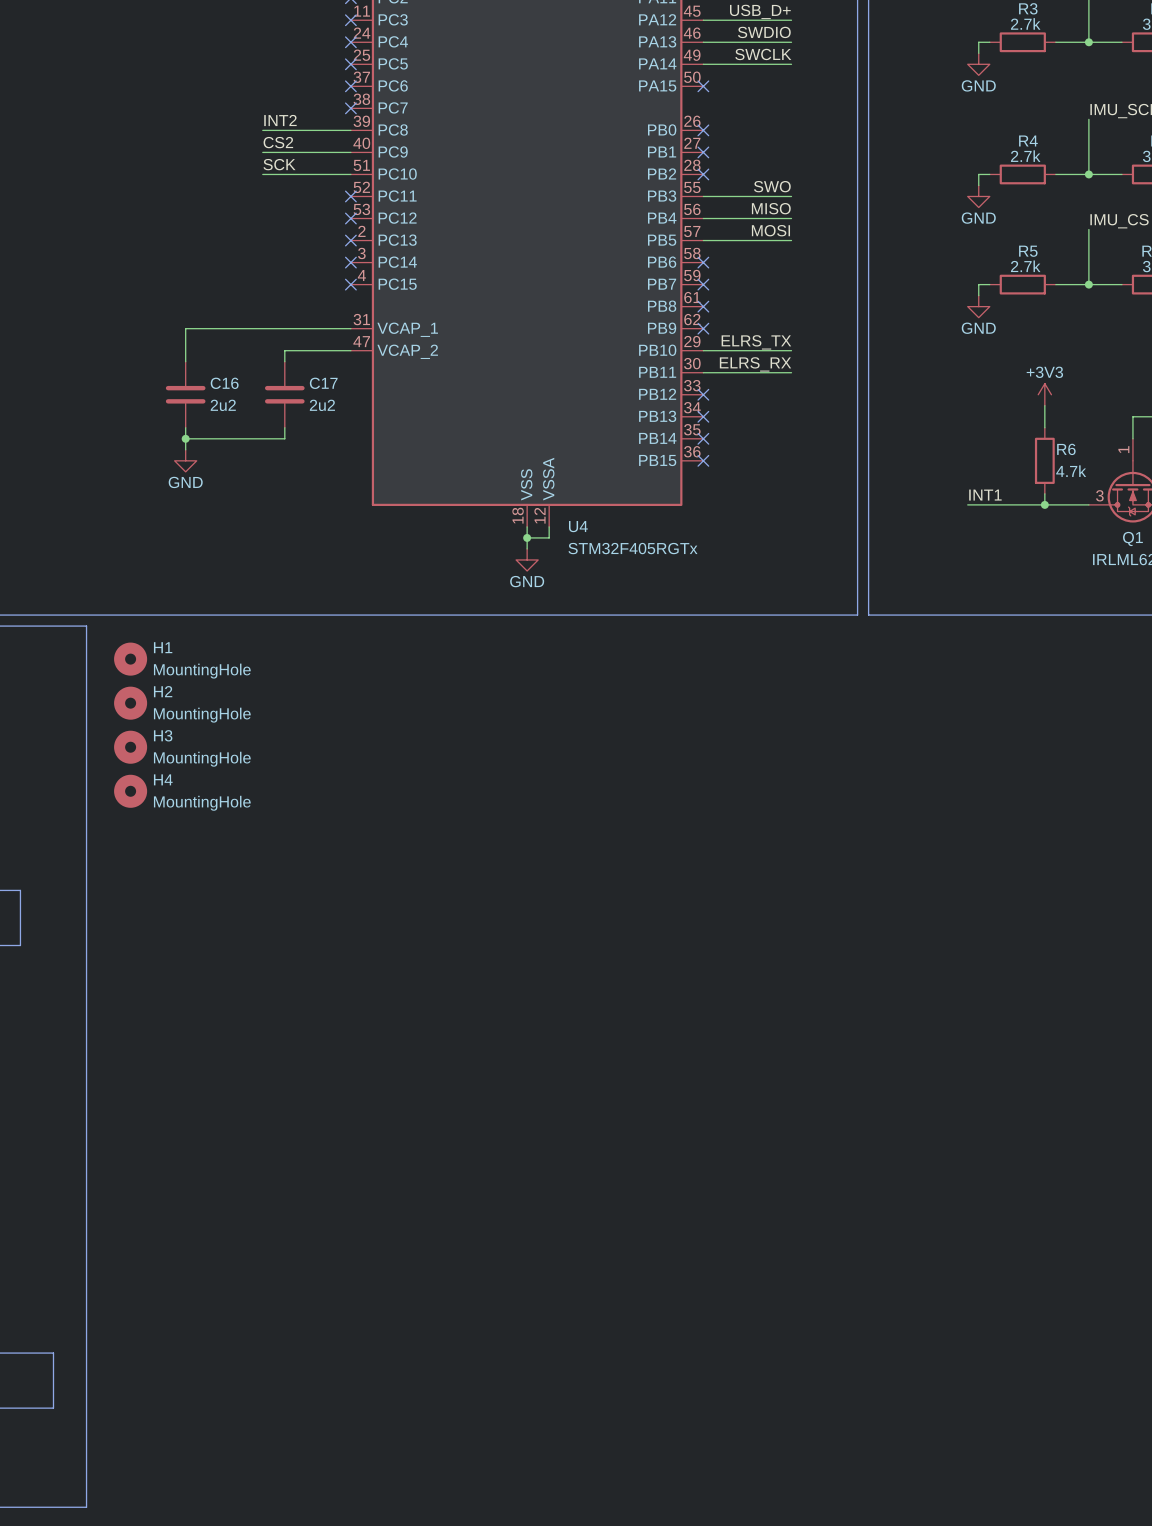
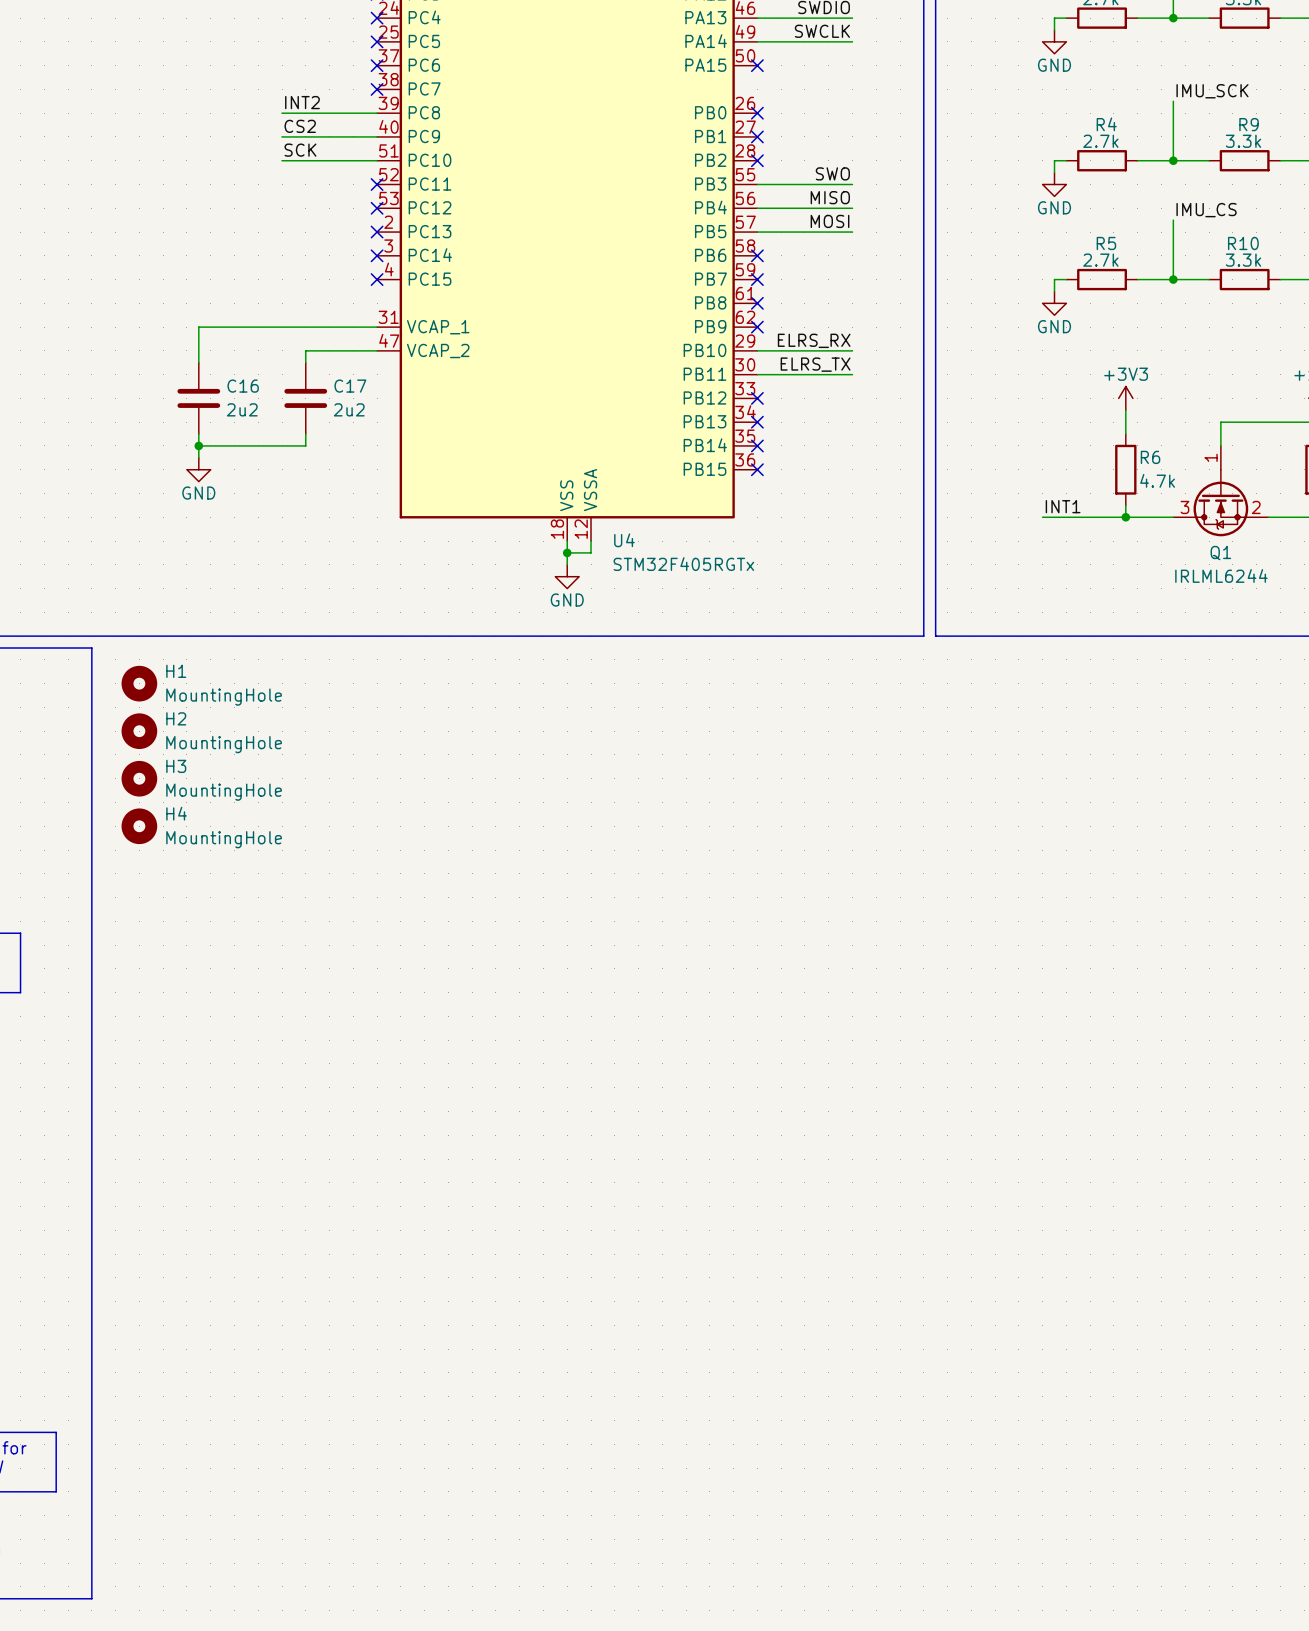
label: ELRS_TX (756, 342) -> ELRS_RX (814, 340)
label: ELRS_RX (755, 364) -> ELRS_TX (815, 364)

